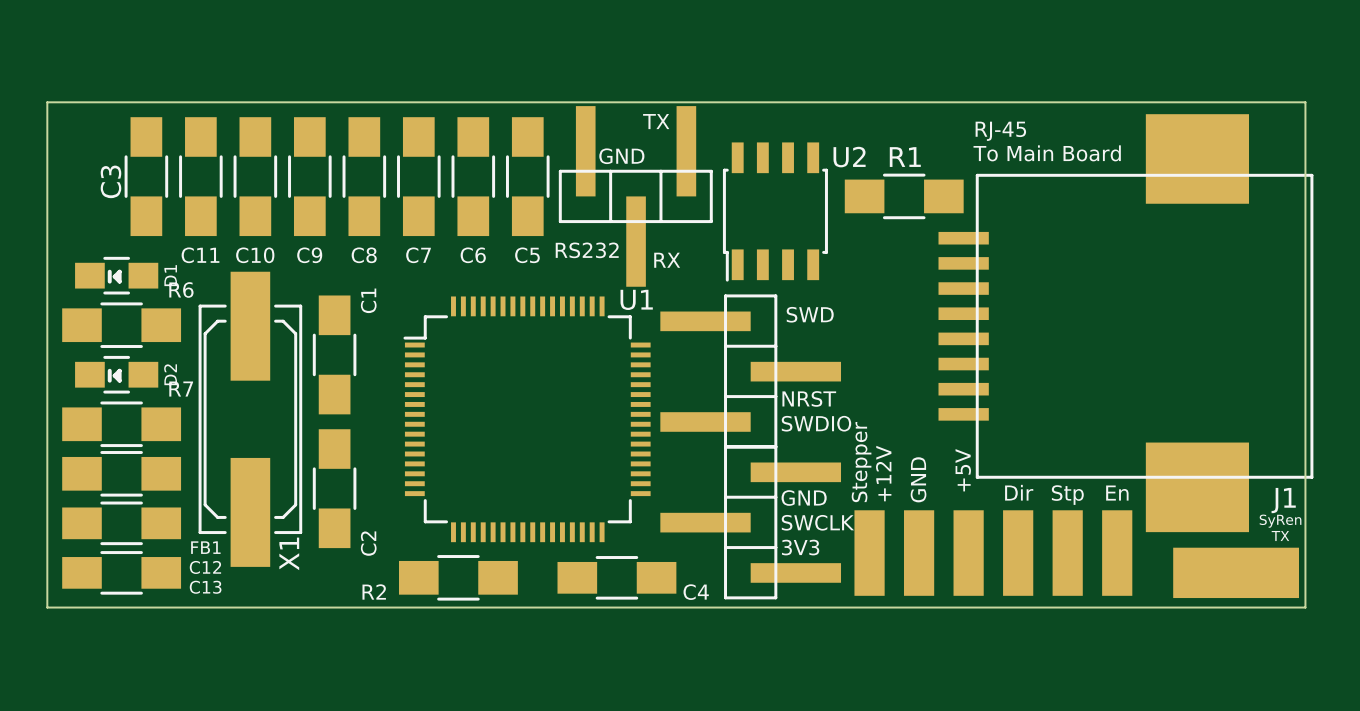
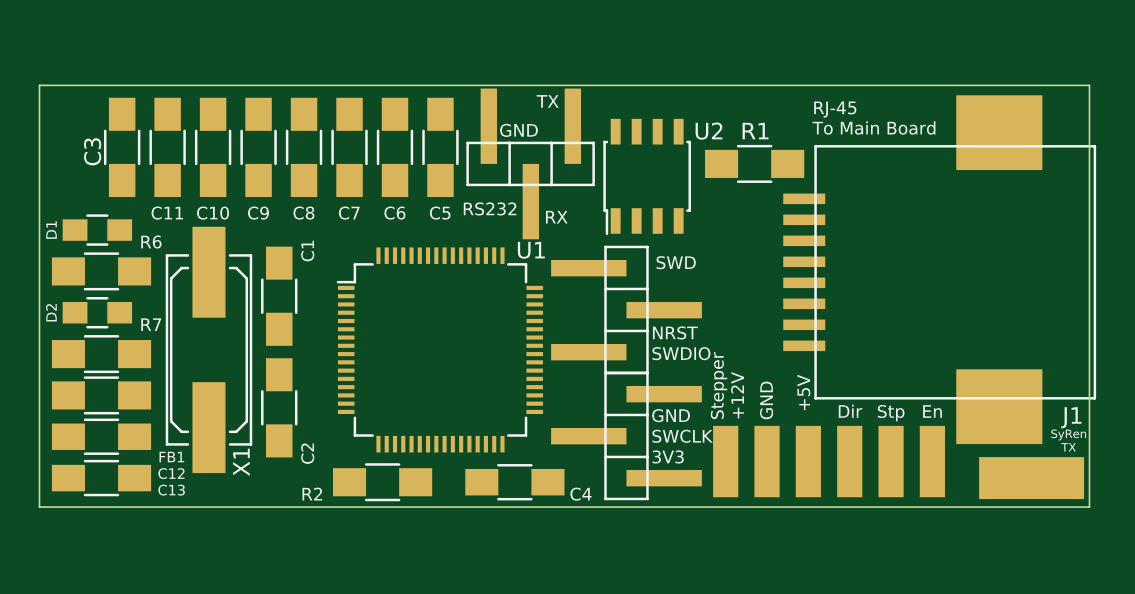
line: (109, 271) (109, 281) -> none
line: (119, 271) (119, 281) (114, 276) (119, 271) -> none
D1 name position: D1 (170, 275) -> D1 (51, 230)
line: (109, 370) (109, 380) -> none
line: (119, 370) (119, 380) (114, 375) (119, 370) -> none
D2 name position: D2 (170, 374) -> D2 (51, 312)

